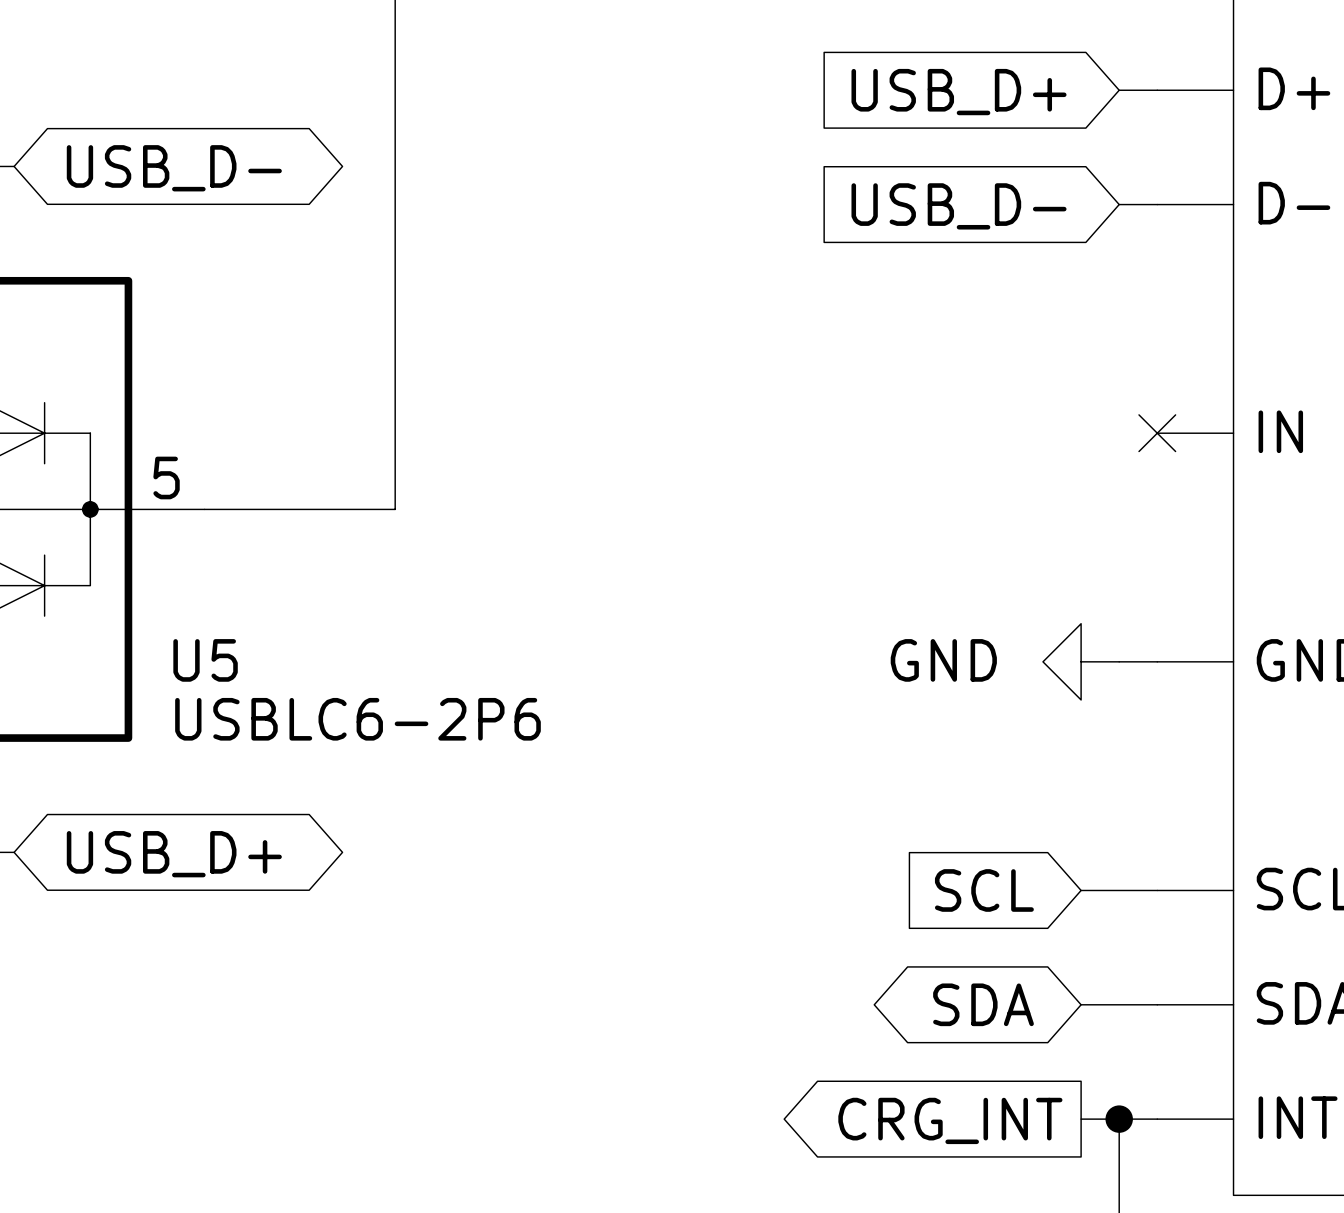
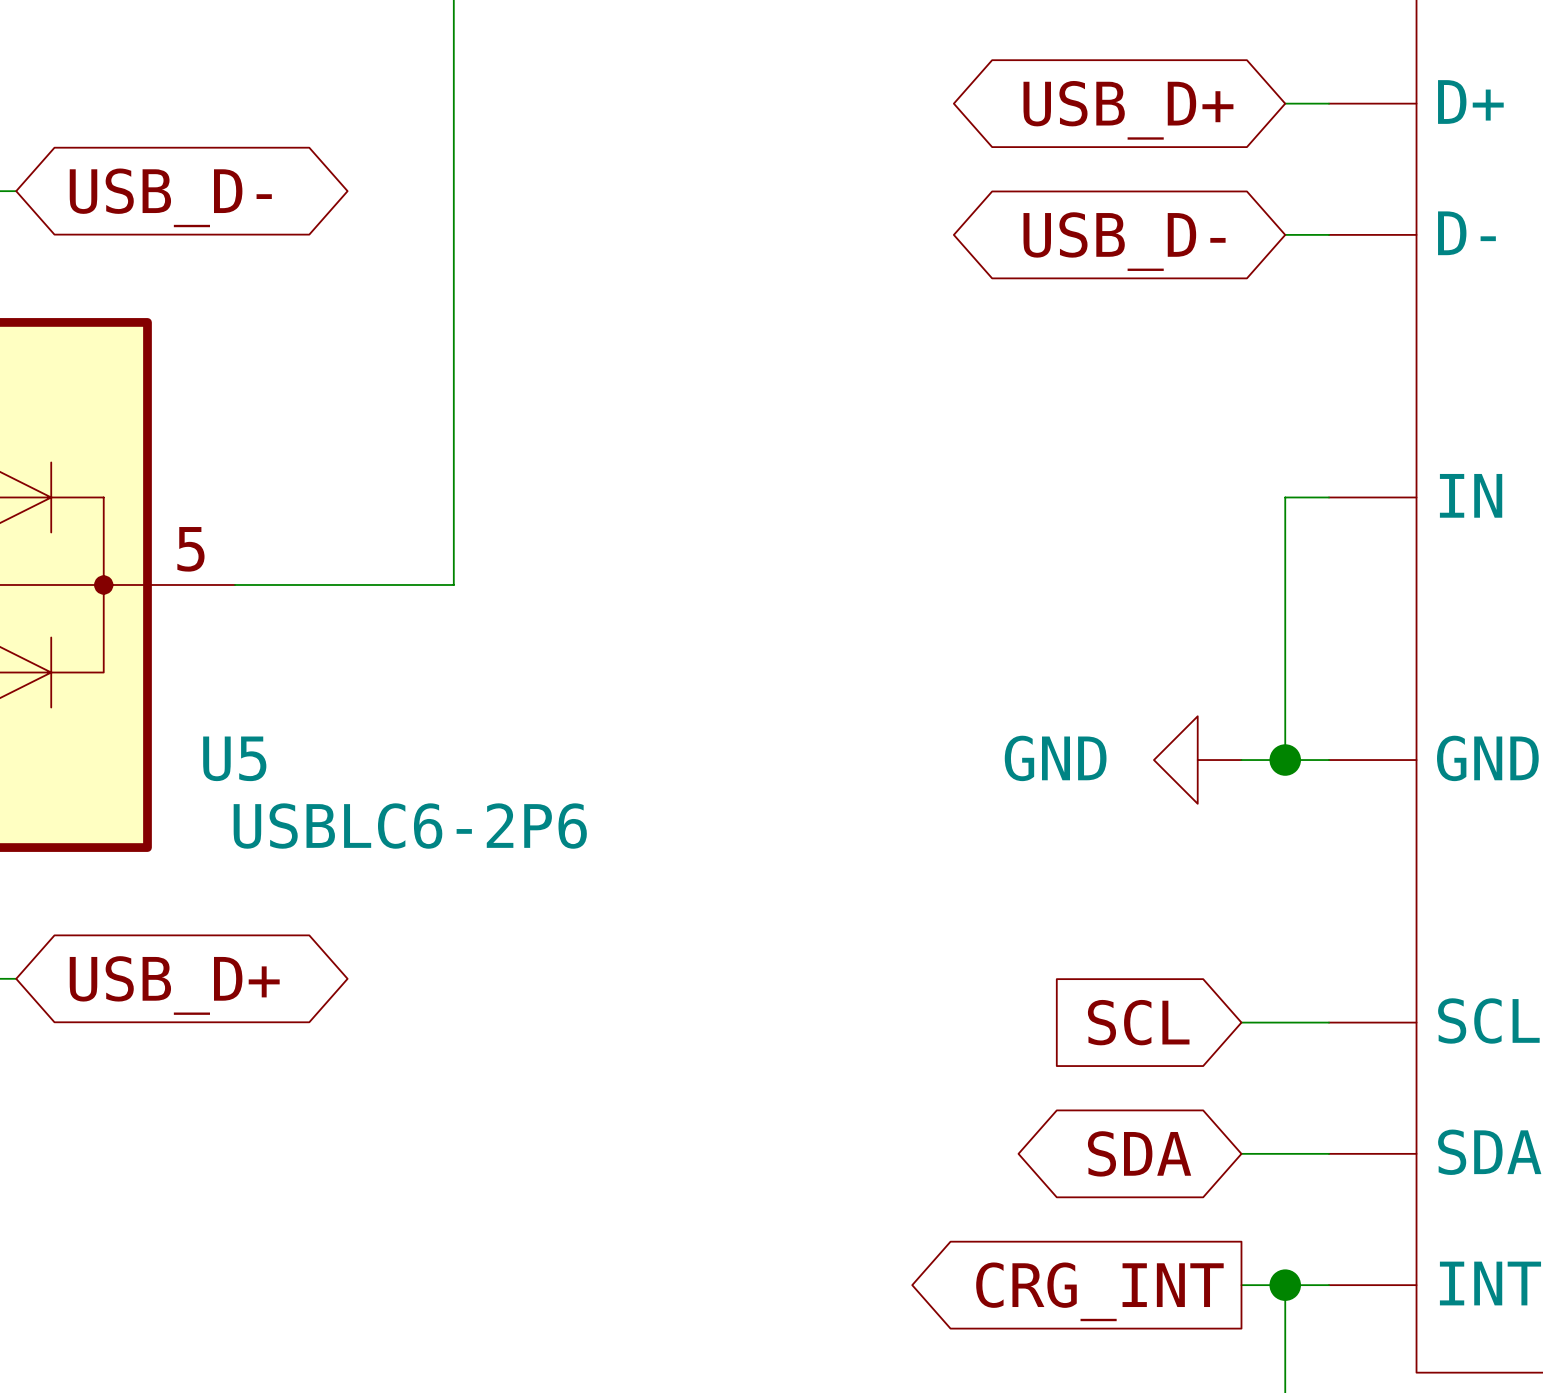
global label shape: input (959, 92) -> bidirectional (1128, 110)
global label shape: input (959, 206) -> bidirectional (1124, 241)
wire: none -> (1329, 497) (1285, 497) (1285, 760) (1241, 760)
no-connect mark: (1157, 433) -> none
power symbol position: GND (1081, 661) -> GND (1197, 760)
junction: none -> (1285, 760)

